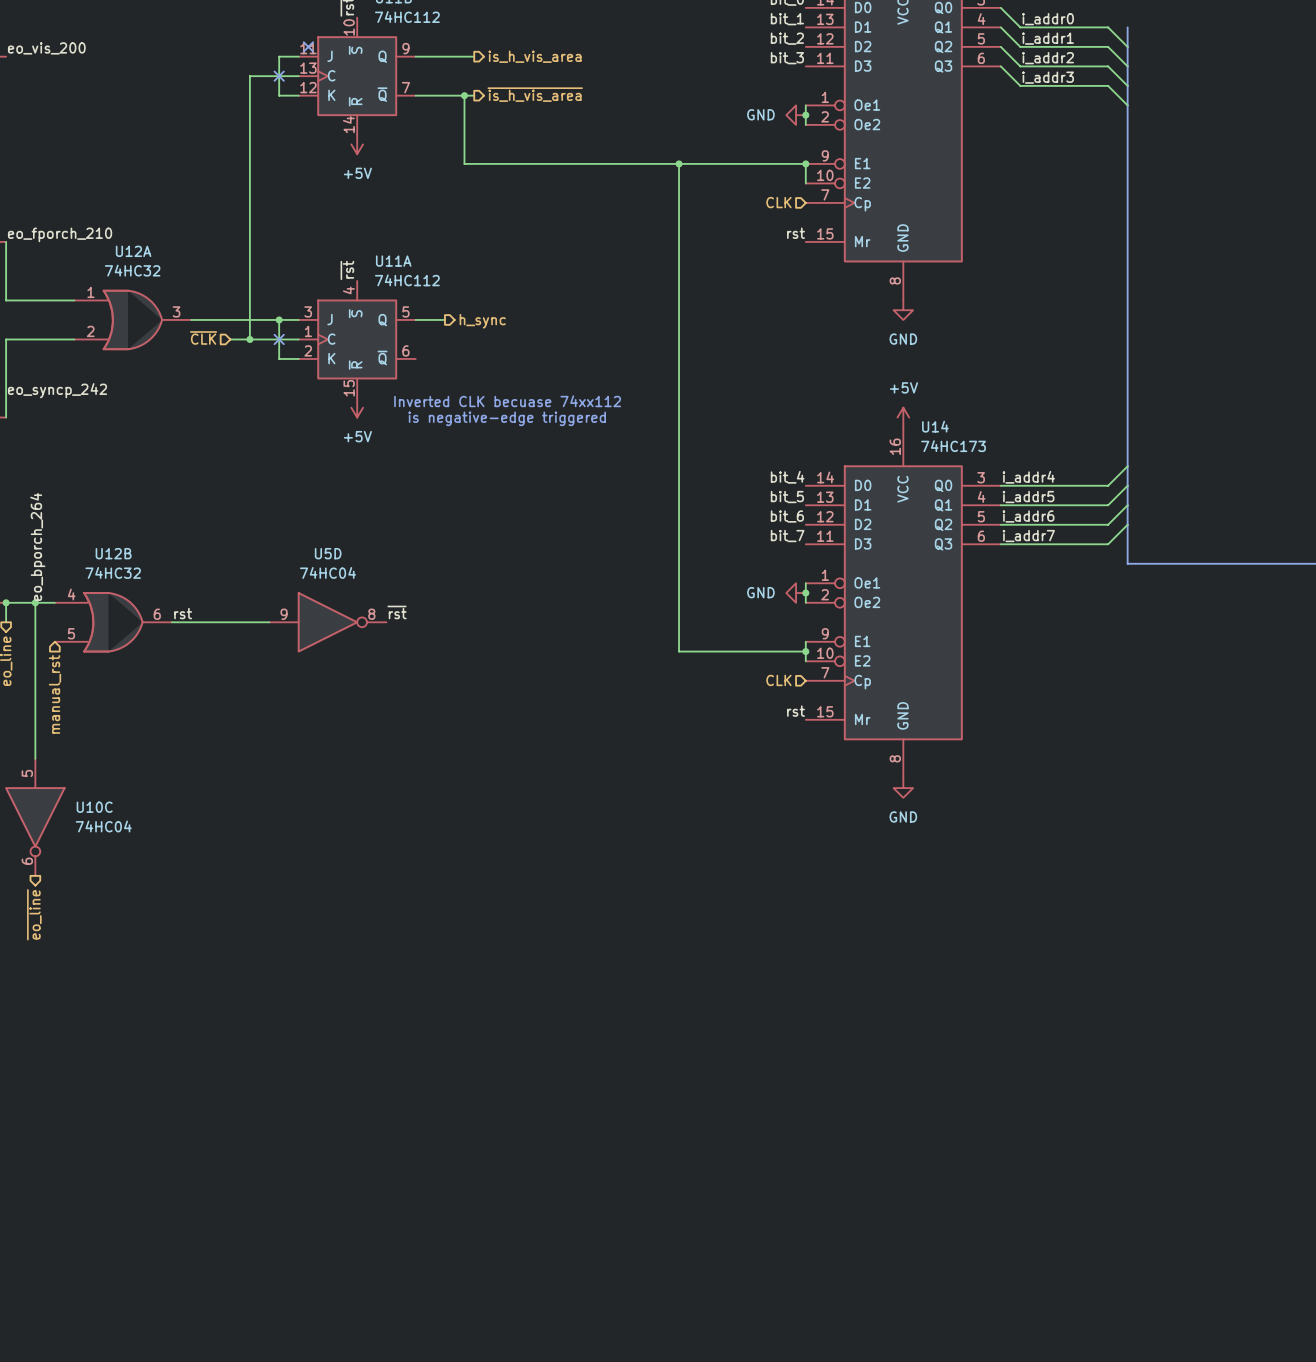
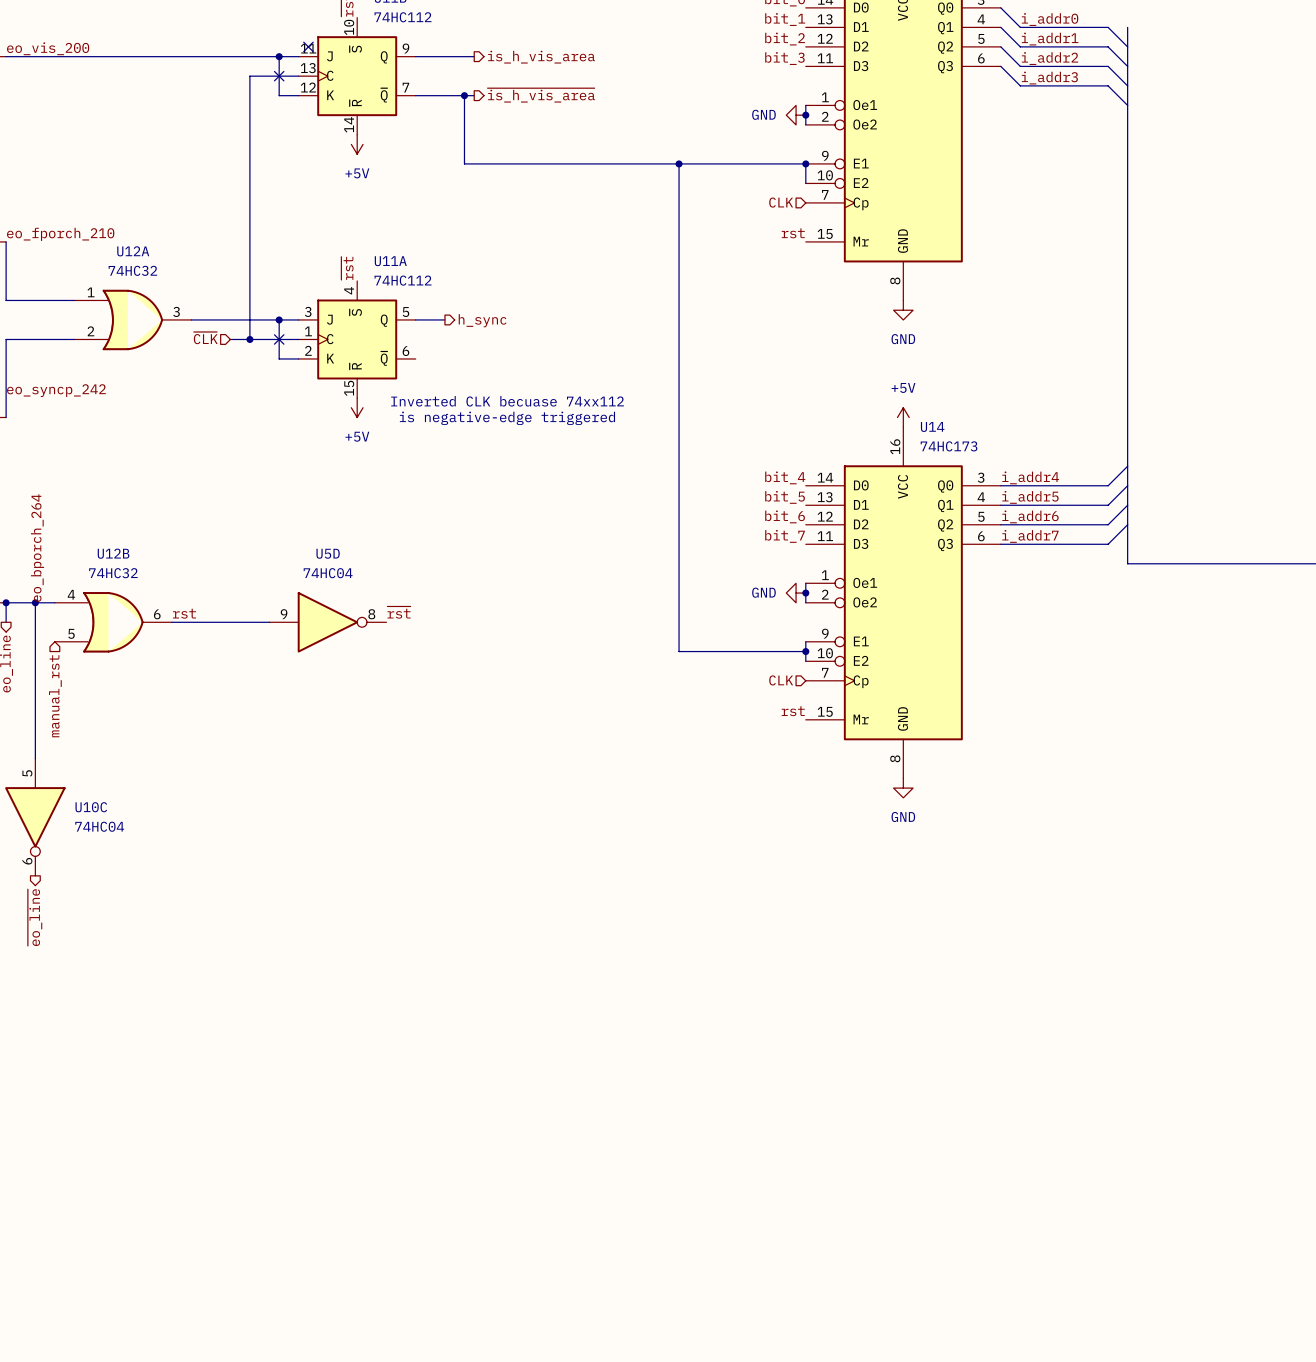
wire: none -> (6, 56) (279, 56)
junction: none -> (279, 56)

